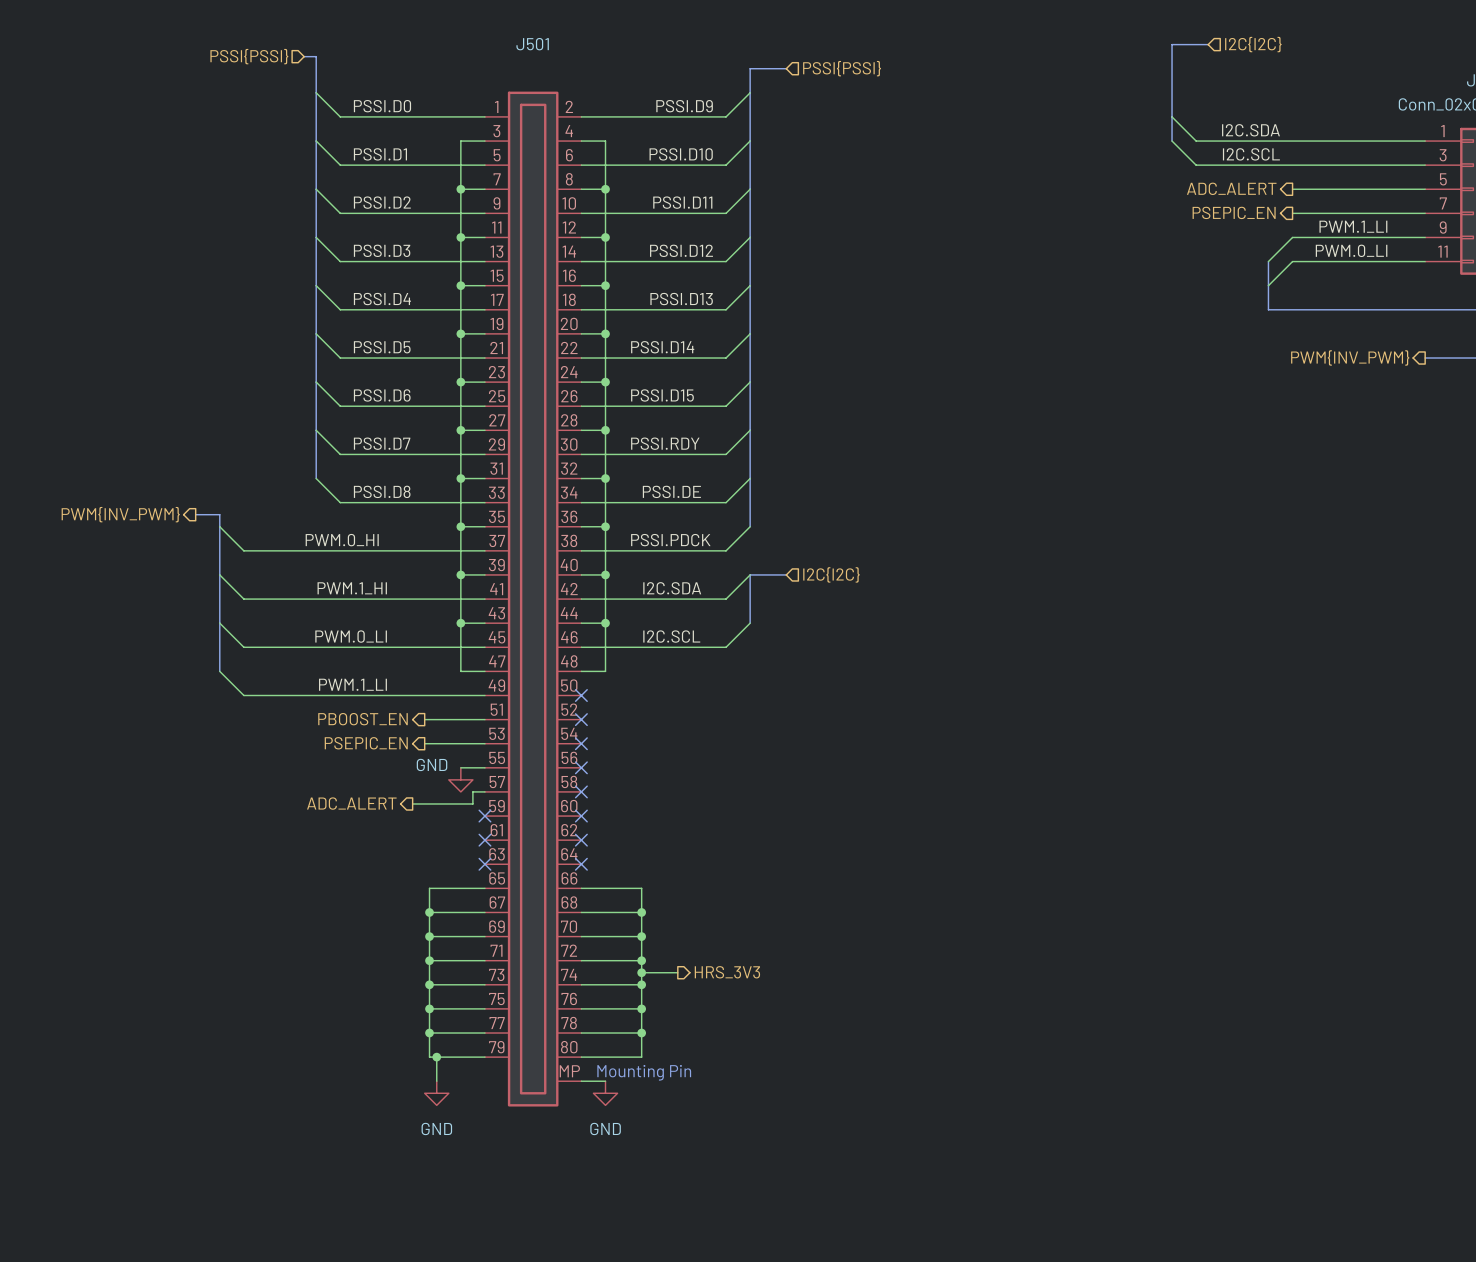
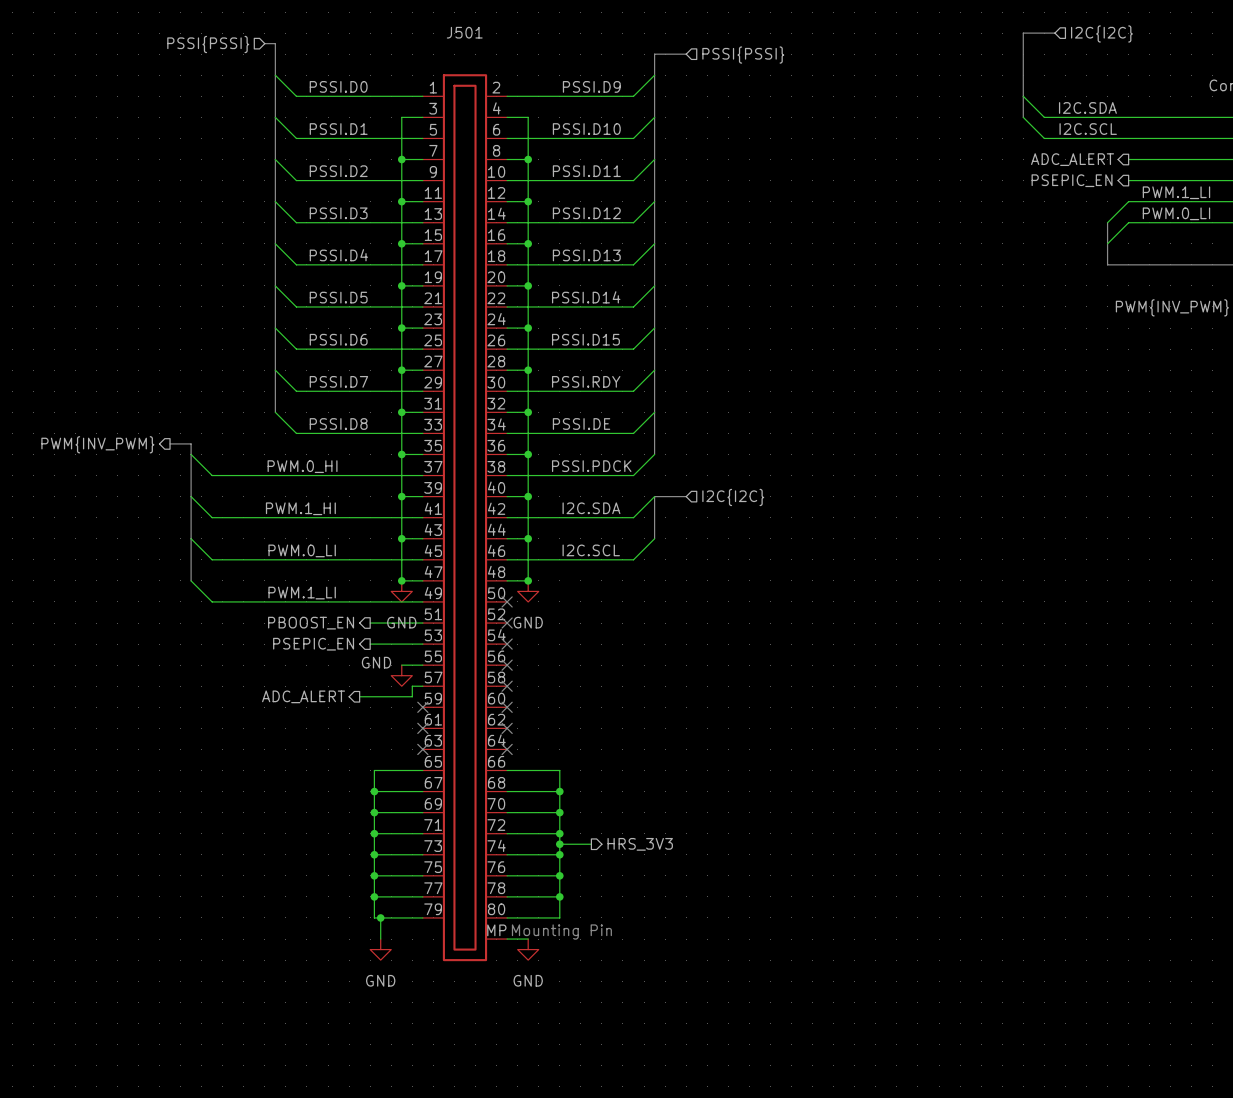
junction: none -> (401, 580)
junction: none -> (528, 580)
power symbol: none -> GND (401, 591)
power symbol: none -> GND (528, 591)

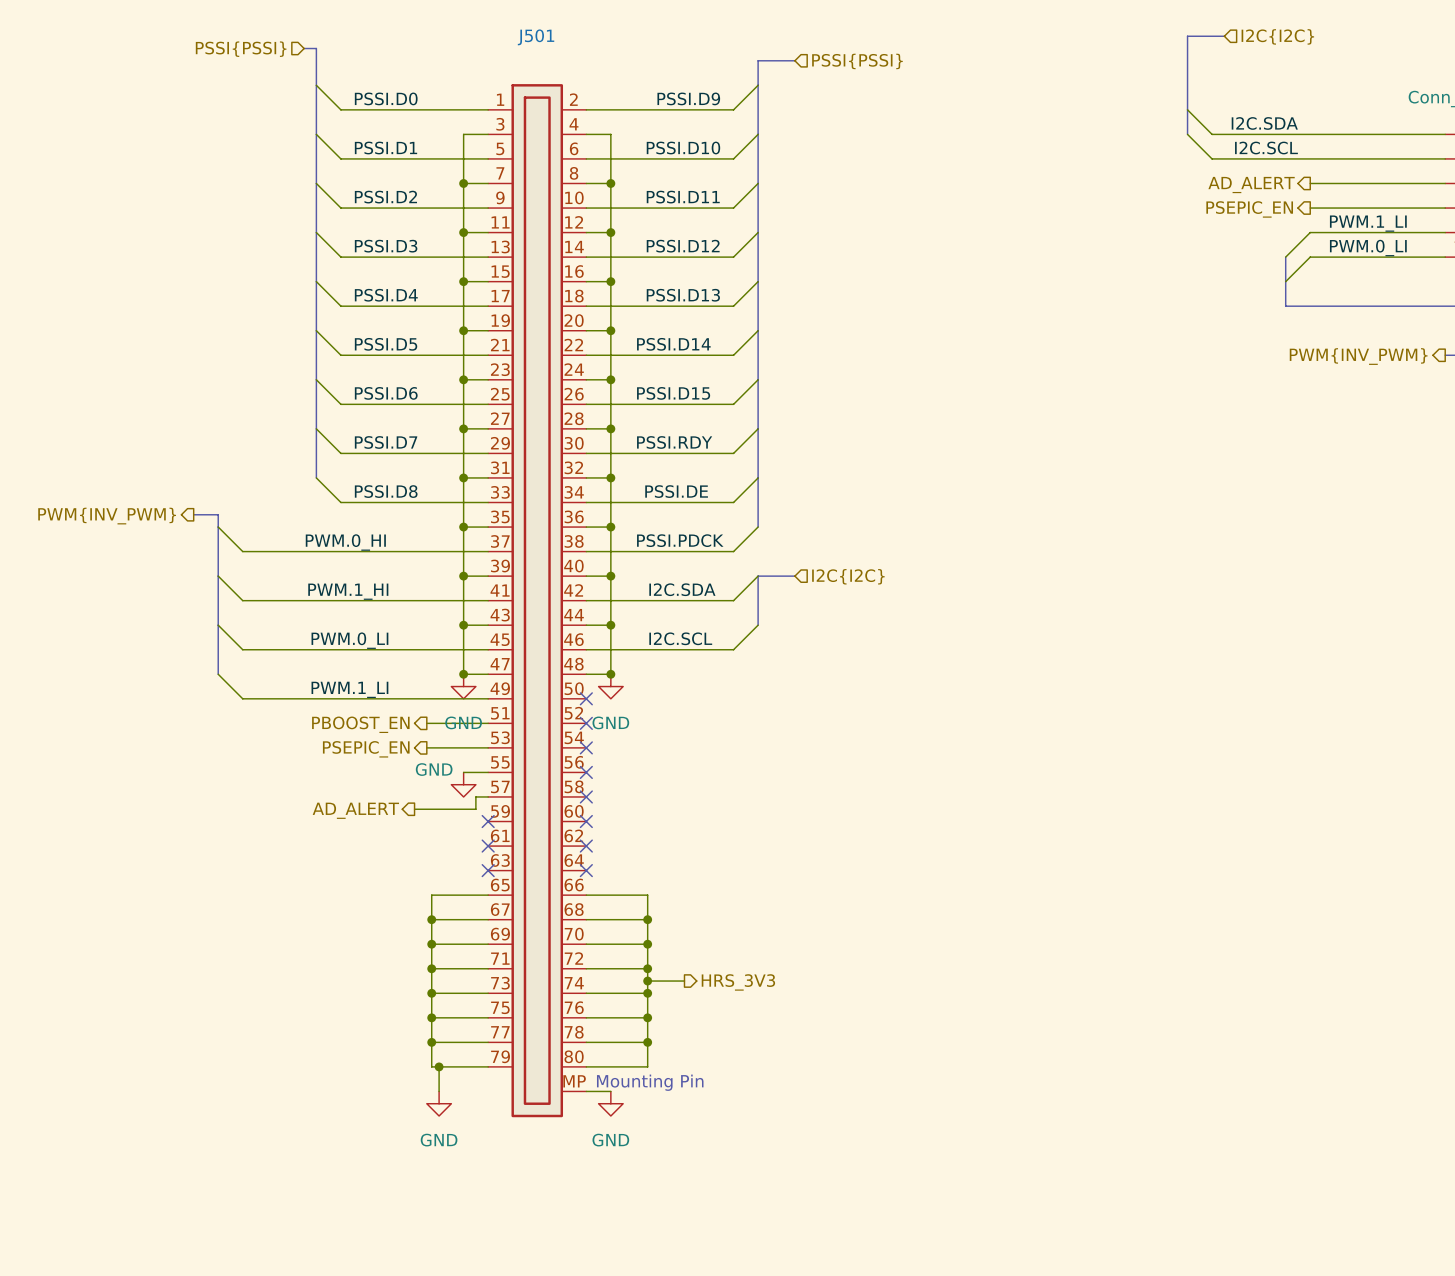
hierarchical label: ADC_ALERT (1072, 159) -> AD_ALERT (1251, 185)
hierarchical label: ADC_ALERT (303, 696) -> AD_ALERT (355, 810)

